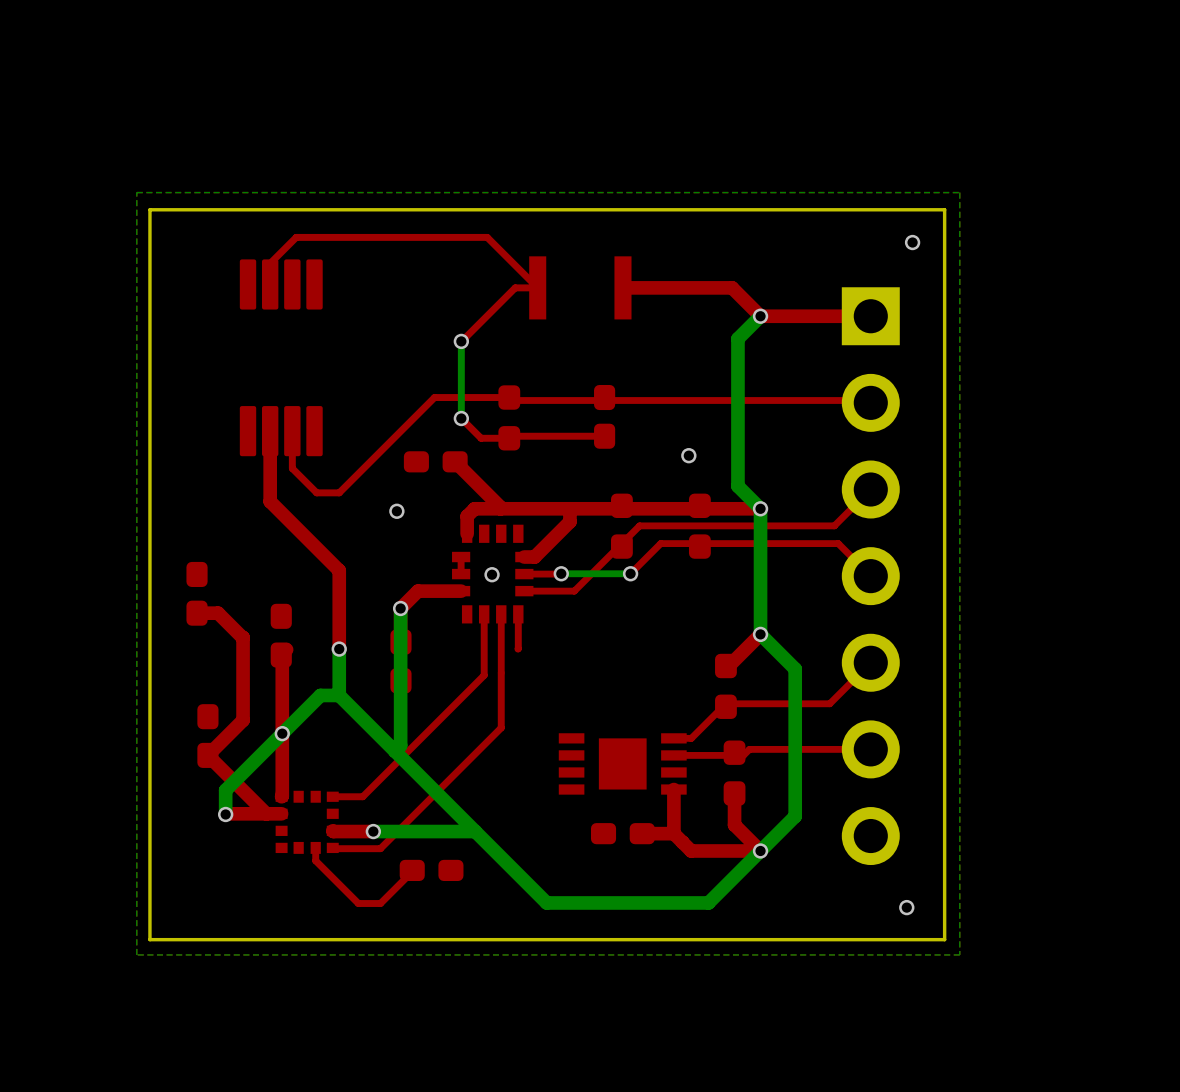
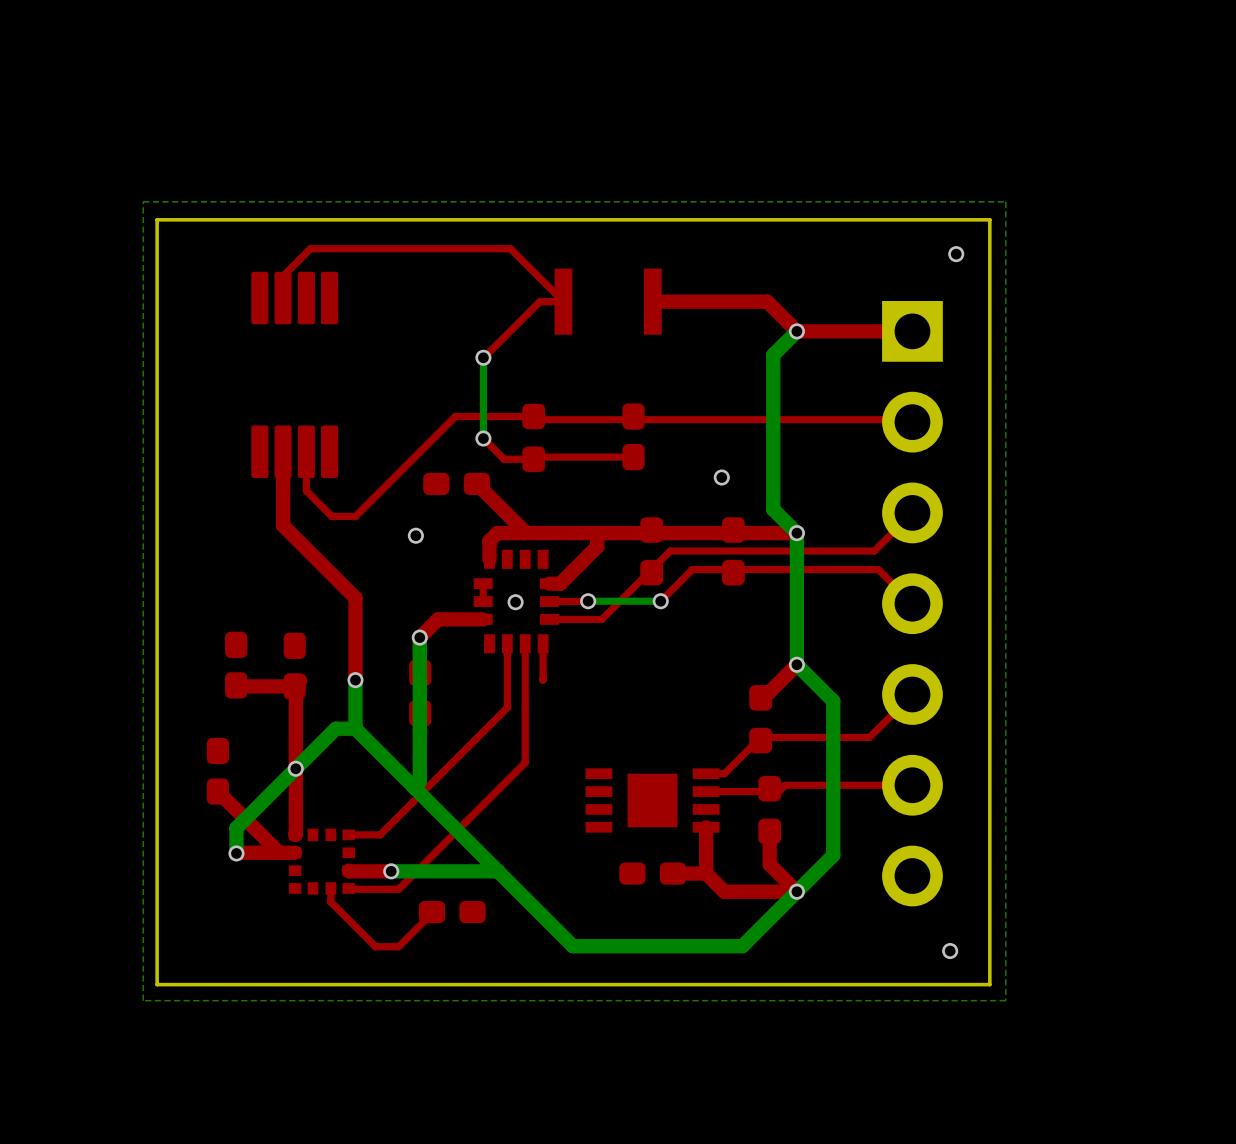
part position: (197, 593) -> (236, 665)
top track: (197, 613) (218, 613) (242, 637) -> none
top track: (243, 637) (243, 720) (207, 755) -> none
top track: none -> (236, 685) (294, 686)

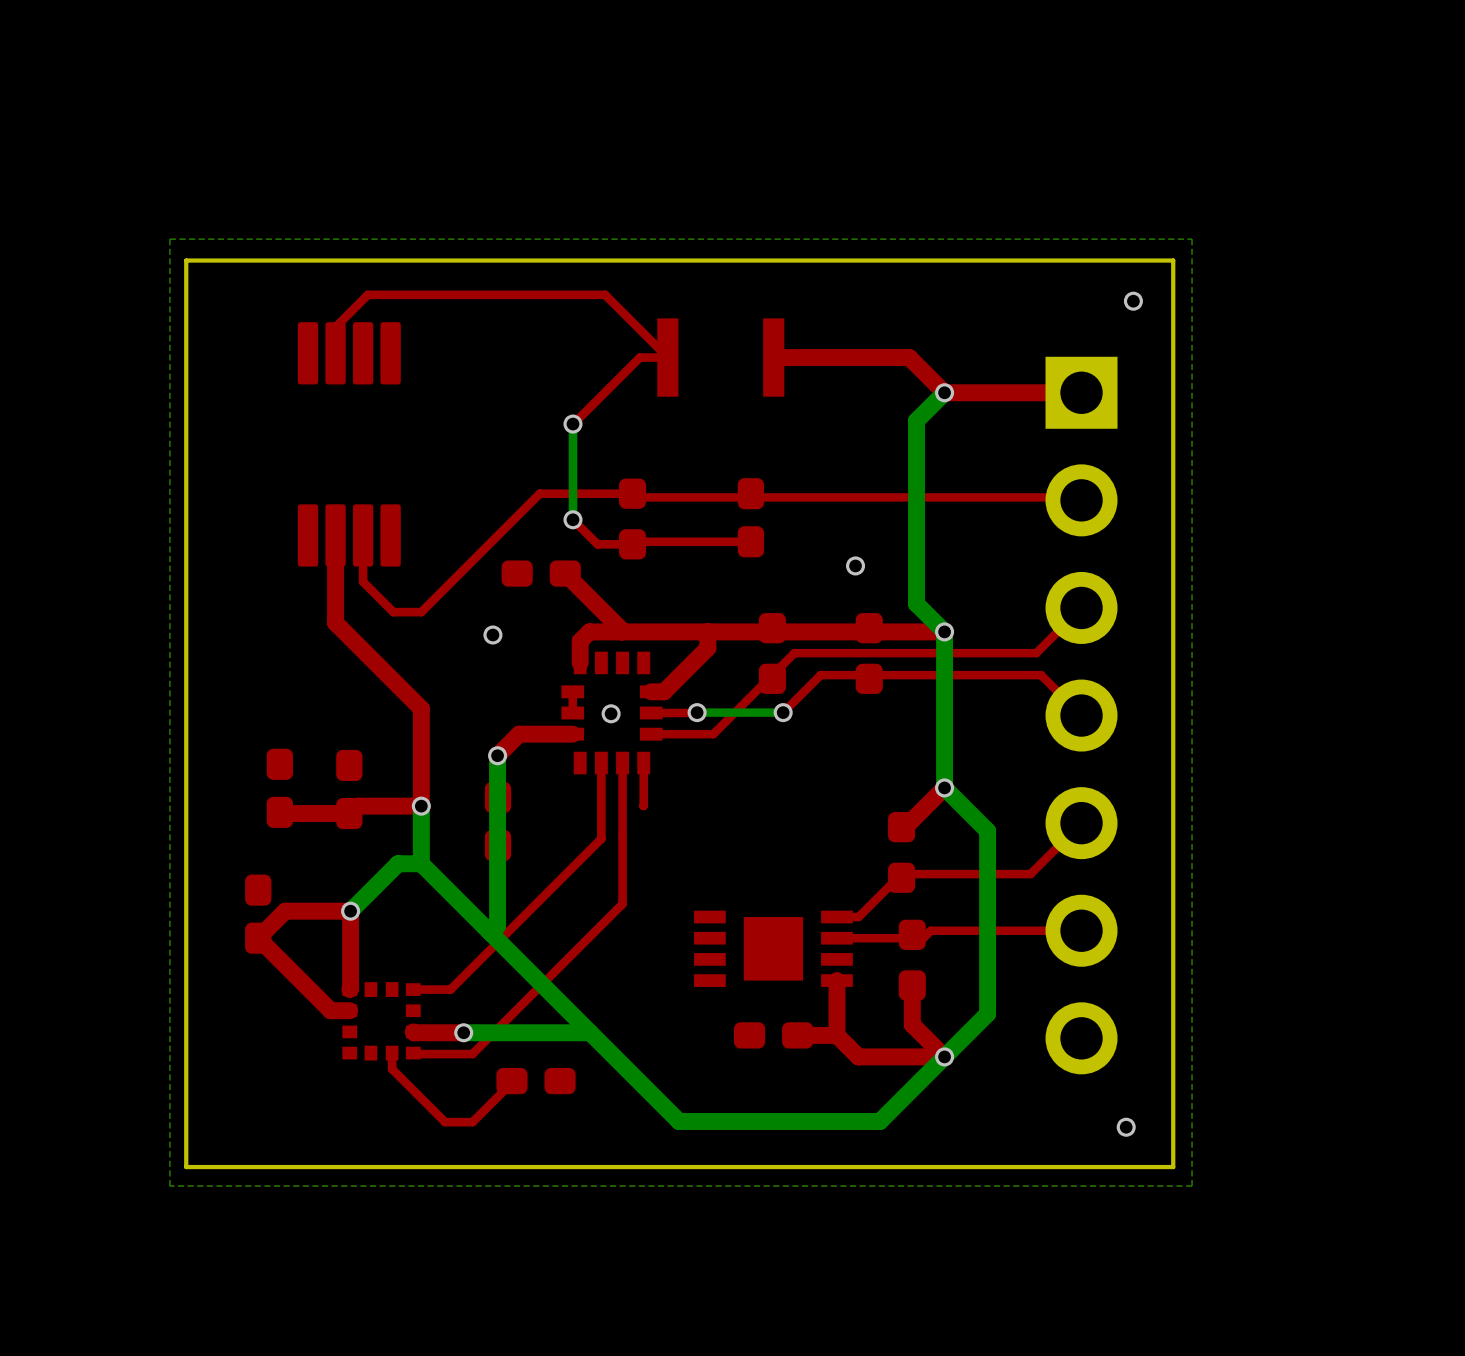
top track: none -> (421, 806) (356, 806)
top track: (294, 686) (295, 768) -> (258, 938) (285, 911) (350, 911)
bottom track: (295, 768) (236, 828) (236, 853) -> none
top track: (279, 852) (236, 853) -> none
via: (236, 853) -> none

